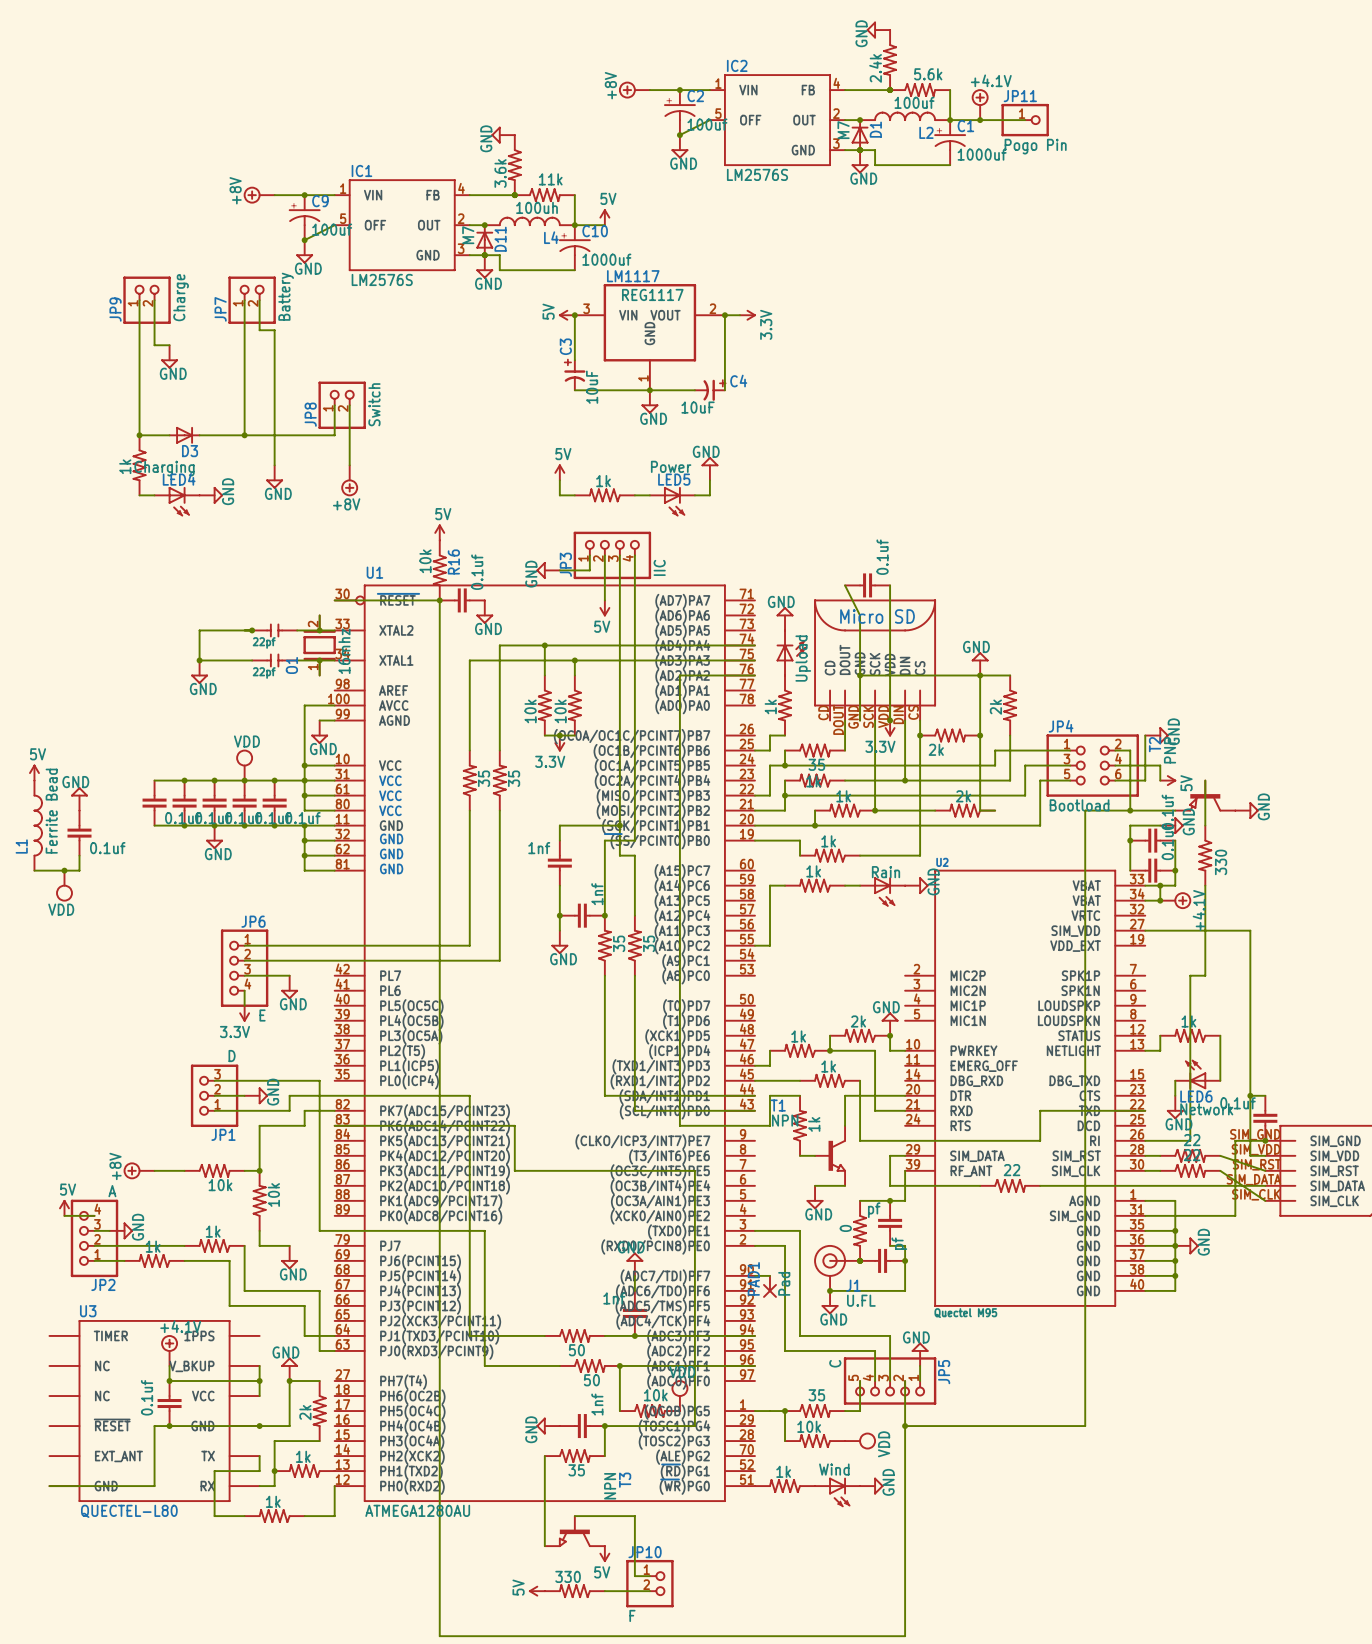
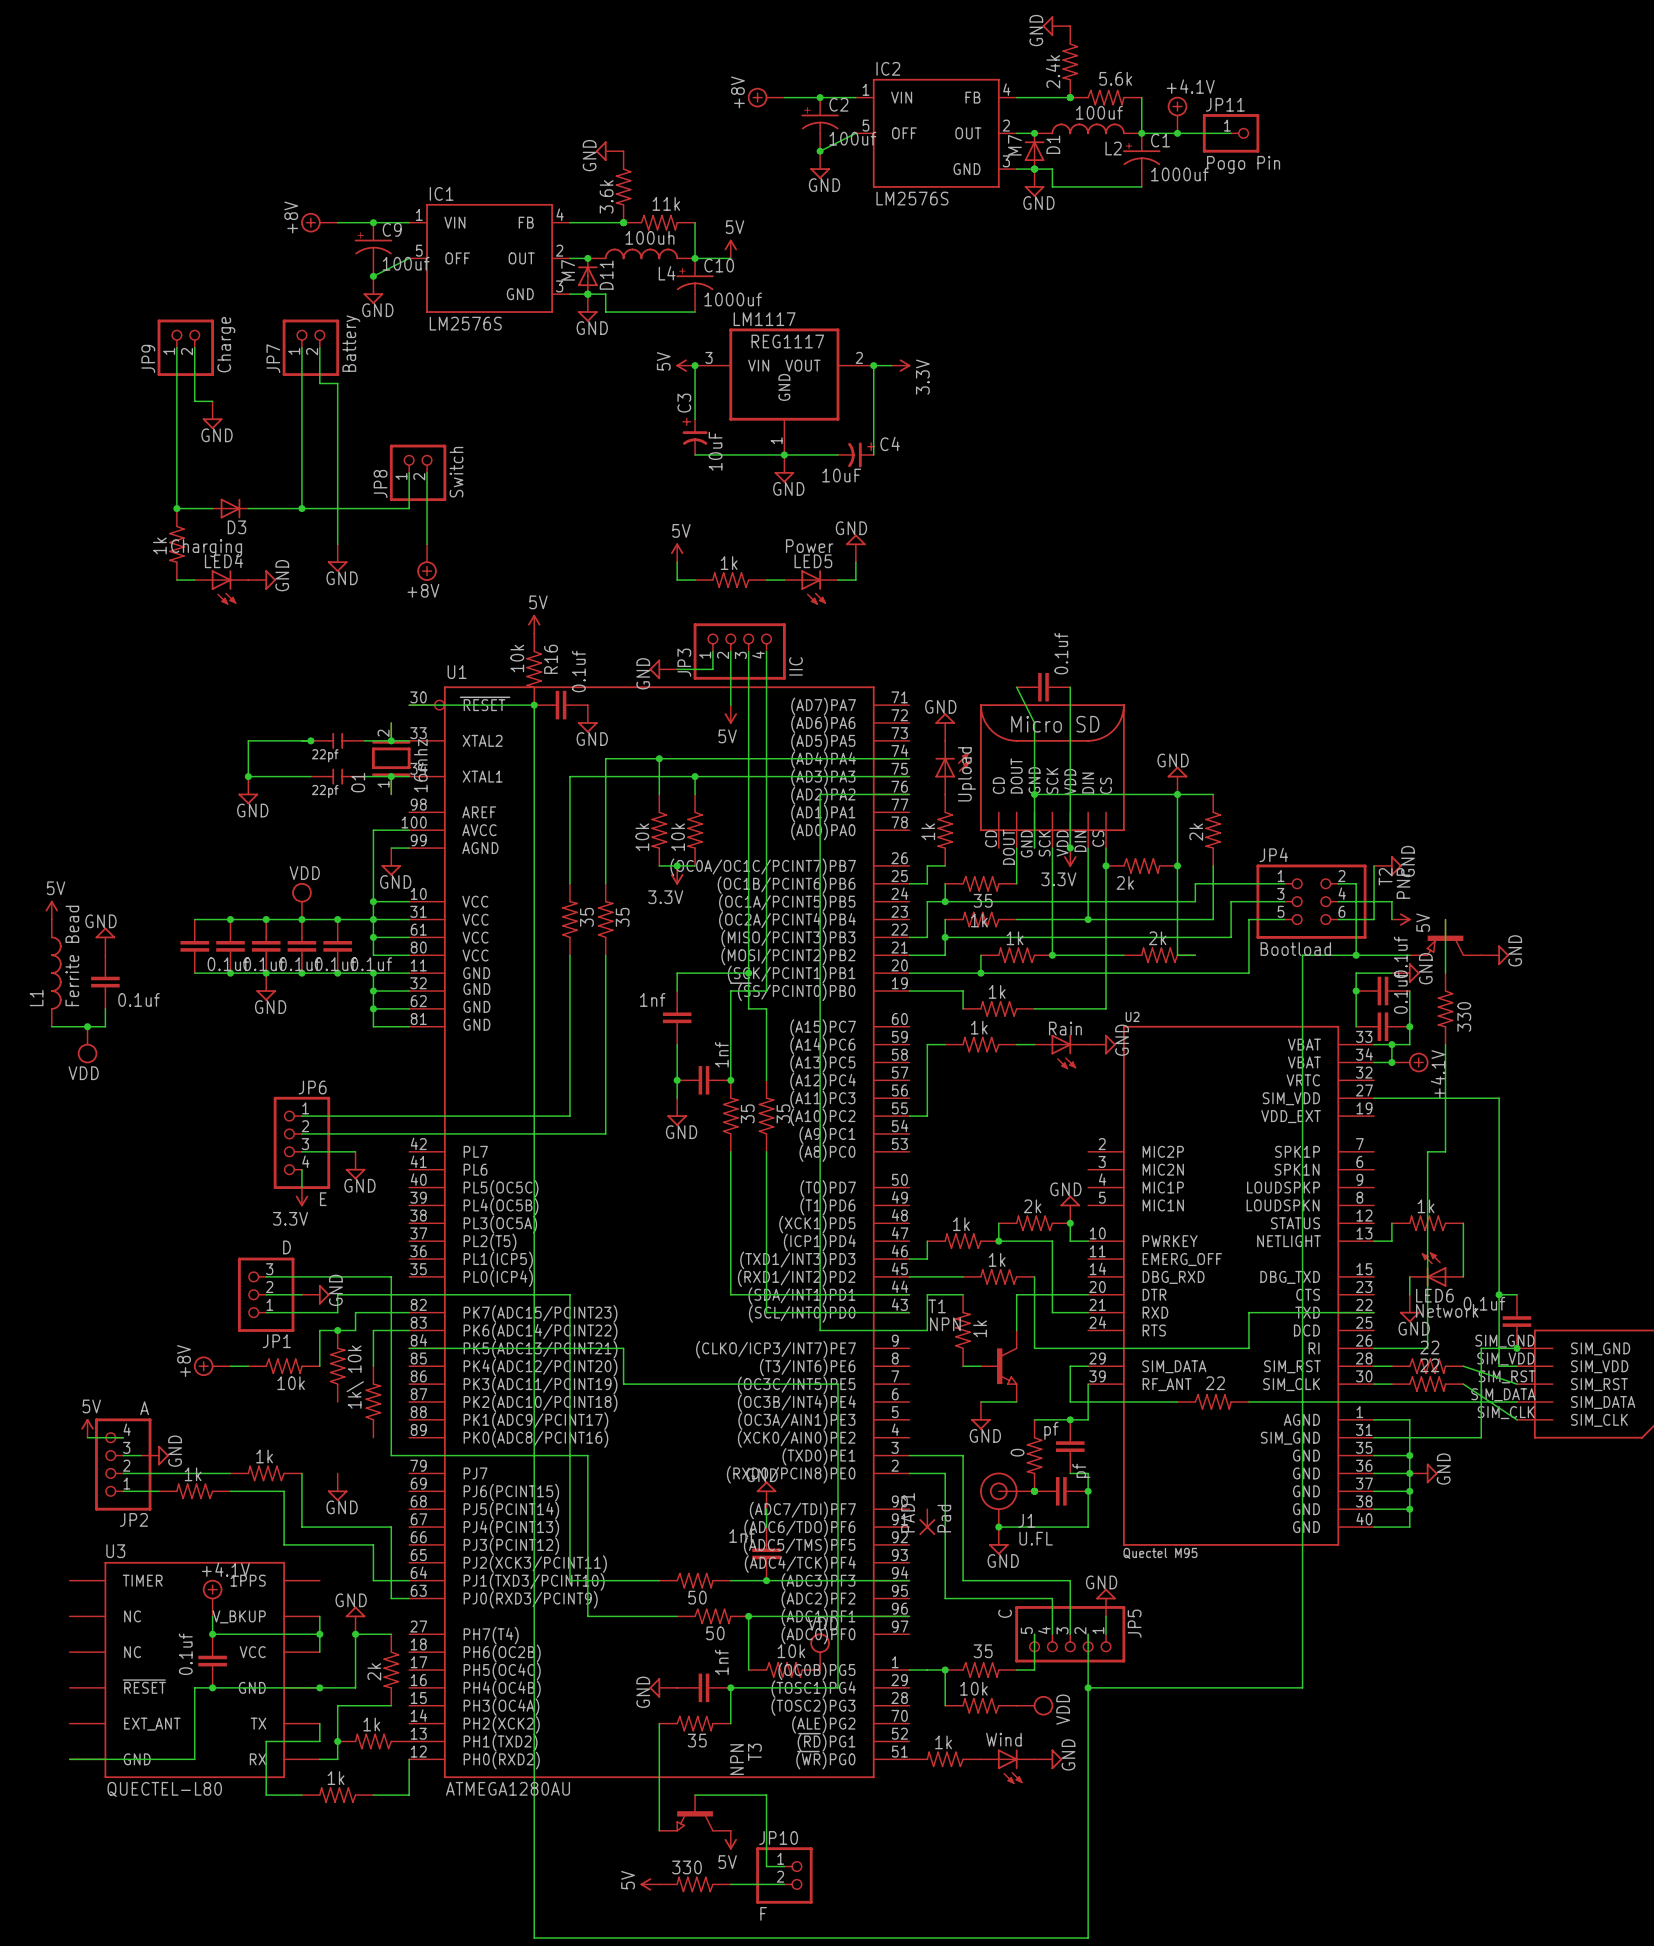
wire: (289, 1095) (289, 1110) (274, 1110) -> (355, 1294) (337, 1294) (337, 1312)
wire: (304, 1110) (304, 1125) (289, 1125) -> (373, 1312) (355, 1312) (355, 1330)
junction: none -> (337, 1330)
wire: (334, 1125) (514, 1125) (514, 1140) -> (409, 1348) (623, 1348)
wire: none -> (409, 1330) (373, 1330) (373, 1366)
wire: none -> (230, 1366) (248, 1366)
wire: (259, 1155) (259, 1170) (244, 1170) -> none
part: none -> 10k (337, 1366)
power symbol position: +8V (139, 1170) -> +8V (212, 1366)
wire: (154, 1170) (184, 1170) -> none
part position: (214, 1170) -> (284, 1366)
junction: (259, 1170) -> none
part: none -> 1k\ (373, 1401)
part: 10k (259, 1200) -> none
wire: (259, 1230) (259, 1245) (289, 1245) -> none
power symbol position: GND (289, 1257) -> GND (337, 1487)
wire: (754, 1275) (769, 1275) -> none

